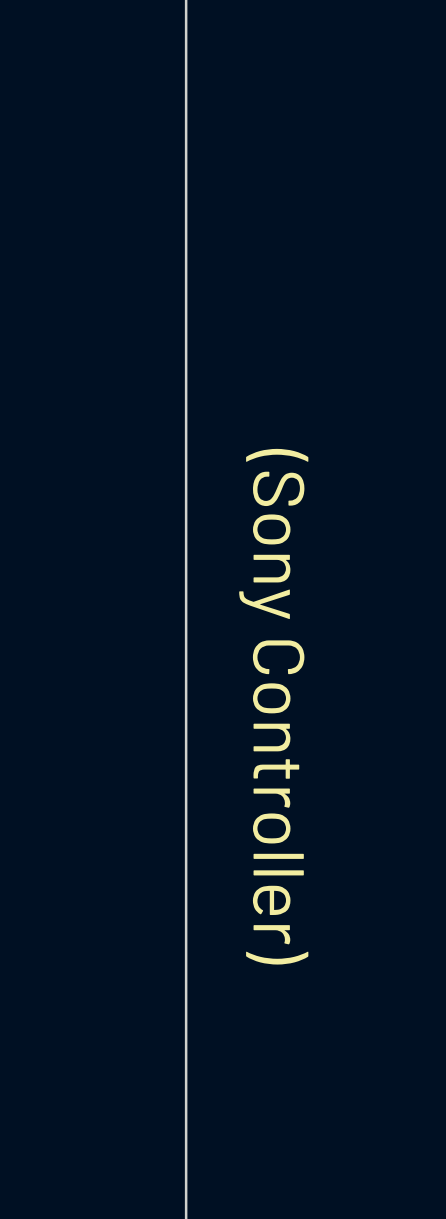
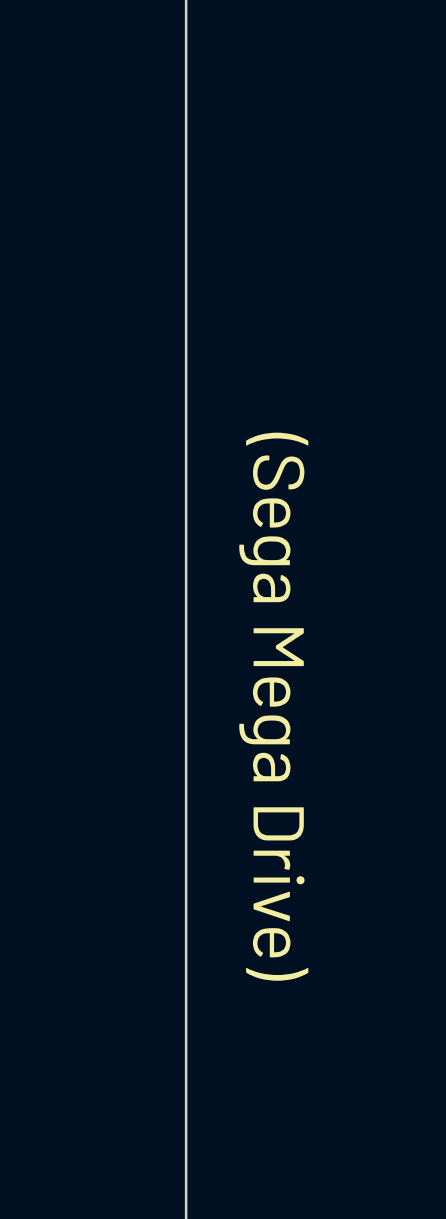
text: (Sony Controller) (273, 706) -> (Sega Mega Drive) (273, 706)

